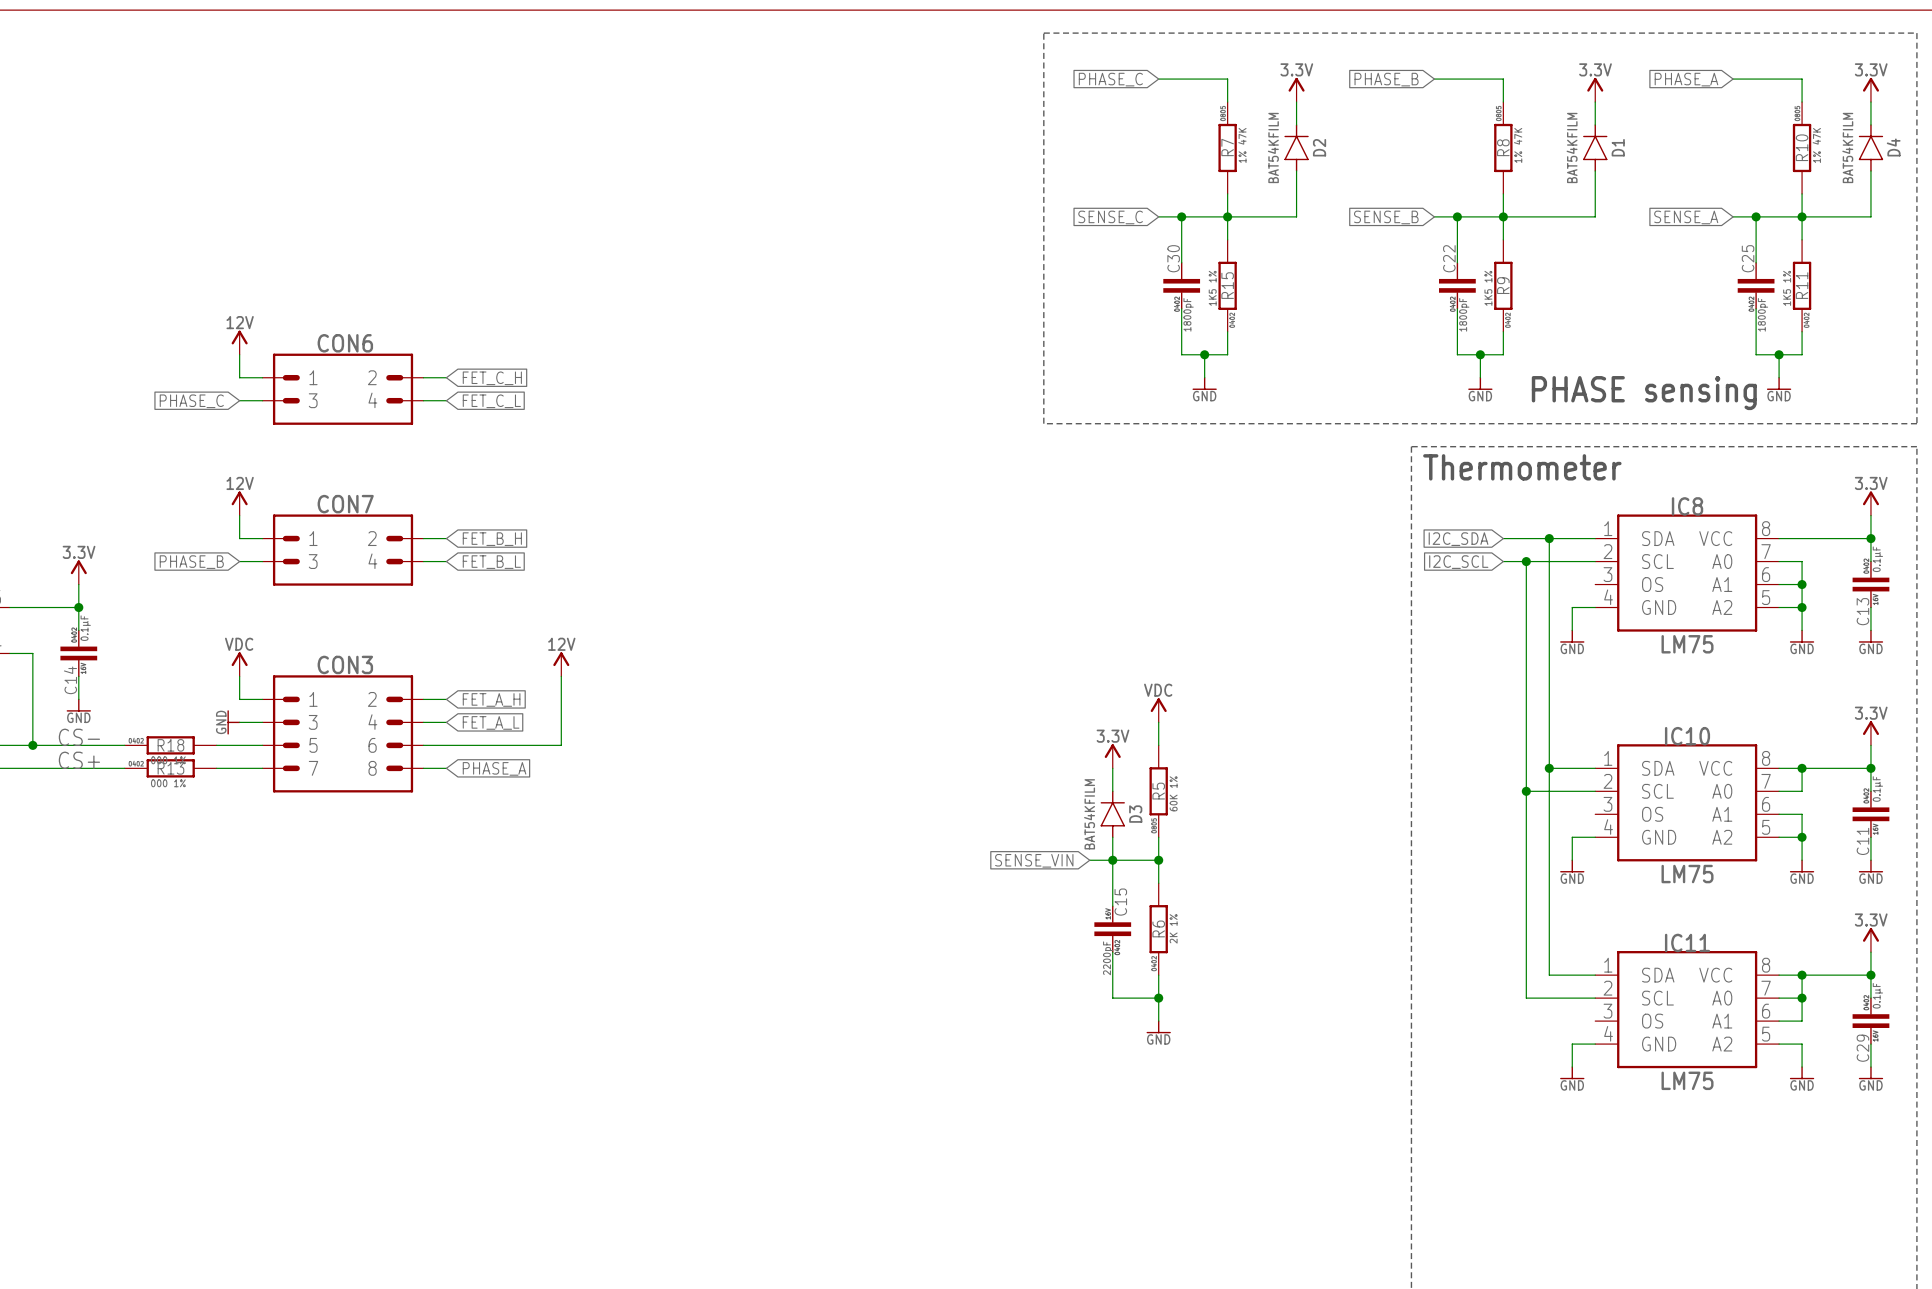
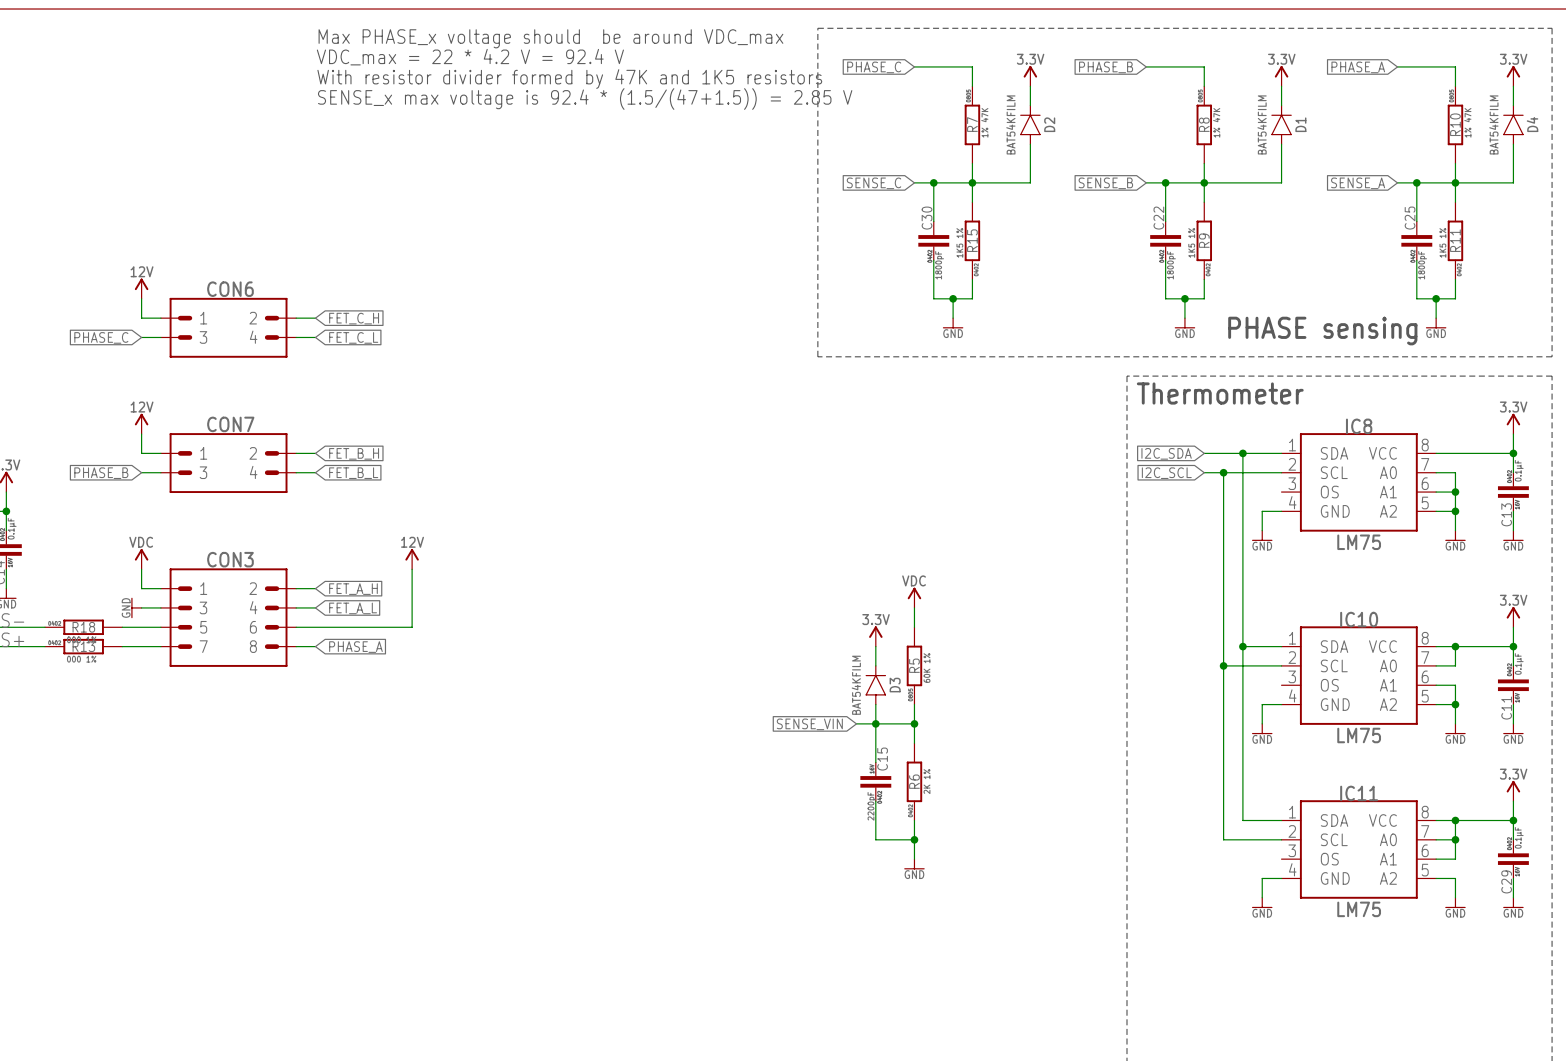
text: none -> Max PHASE_x voltage should be around VDC_max (550, 38)
text: none -> VDC_max = 22 * 4.2 V = 92.4 V (470, 57)
text: none -> With resistor divider formed by 47K and 1K5 resistors (569, 79)
text: none -> SENSE_x max voltage is 92.4 * (1.5/(47+1.5)) = 2.85 V (585, 99)

